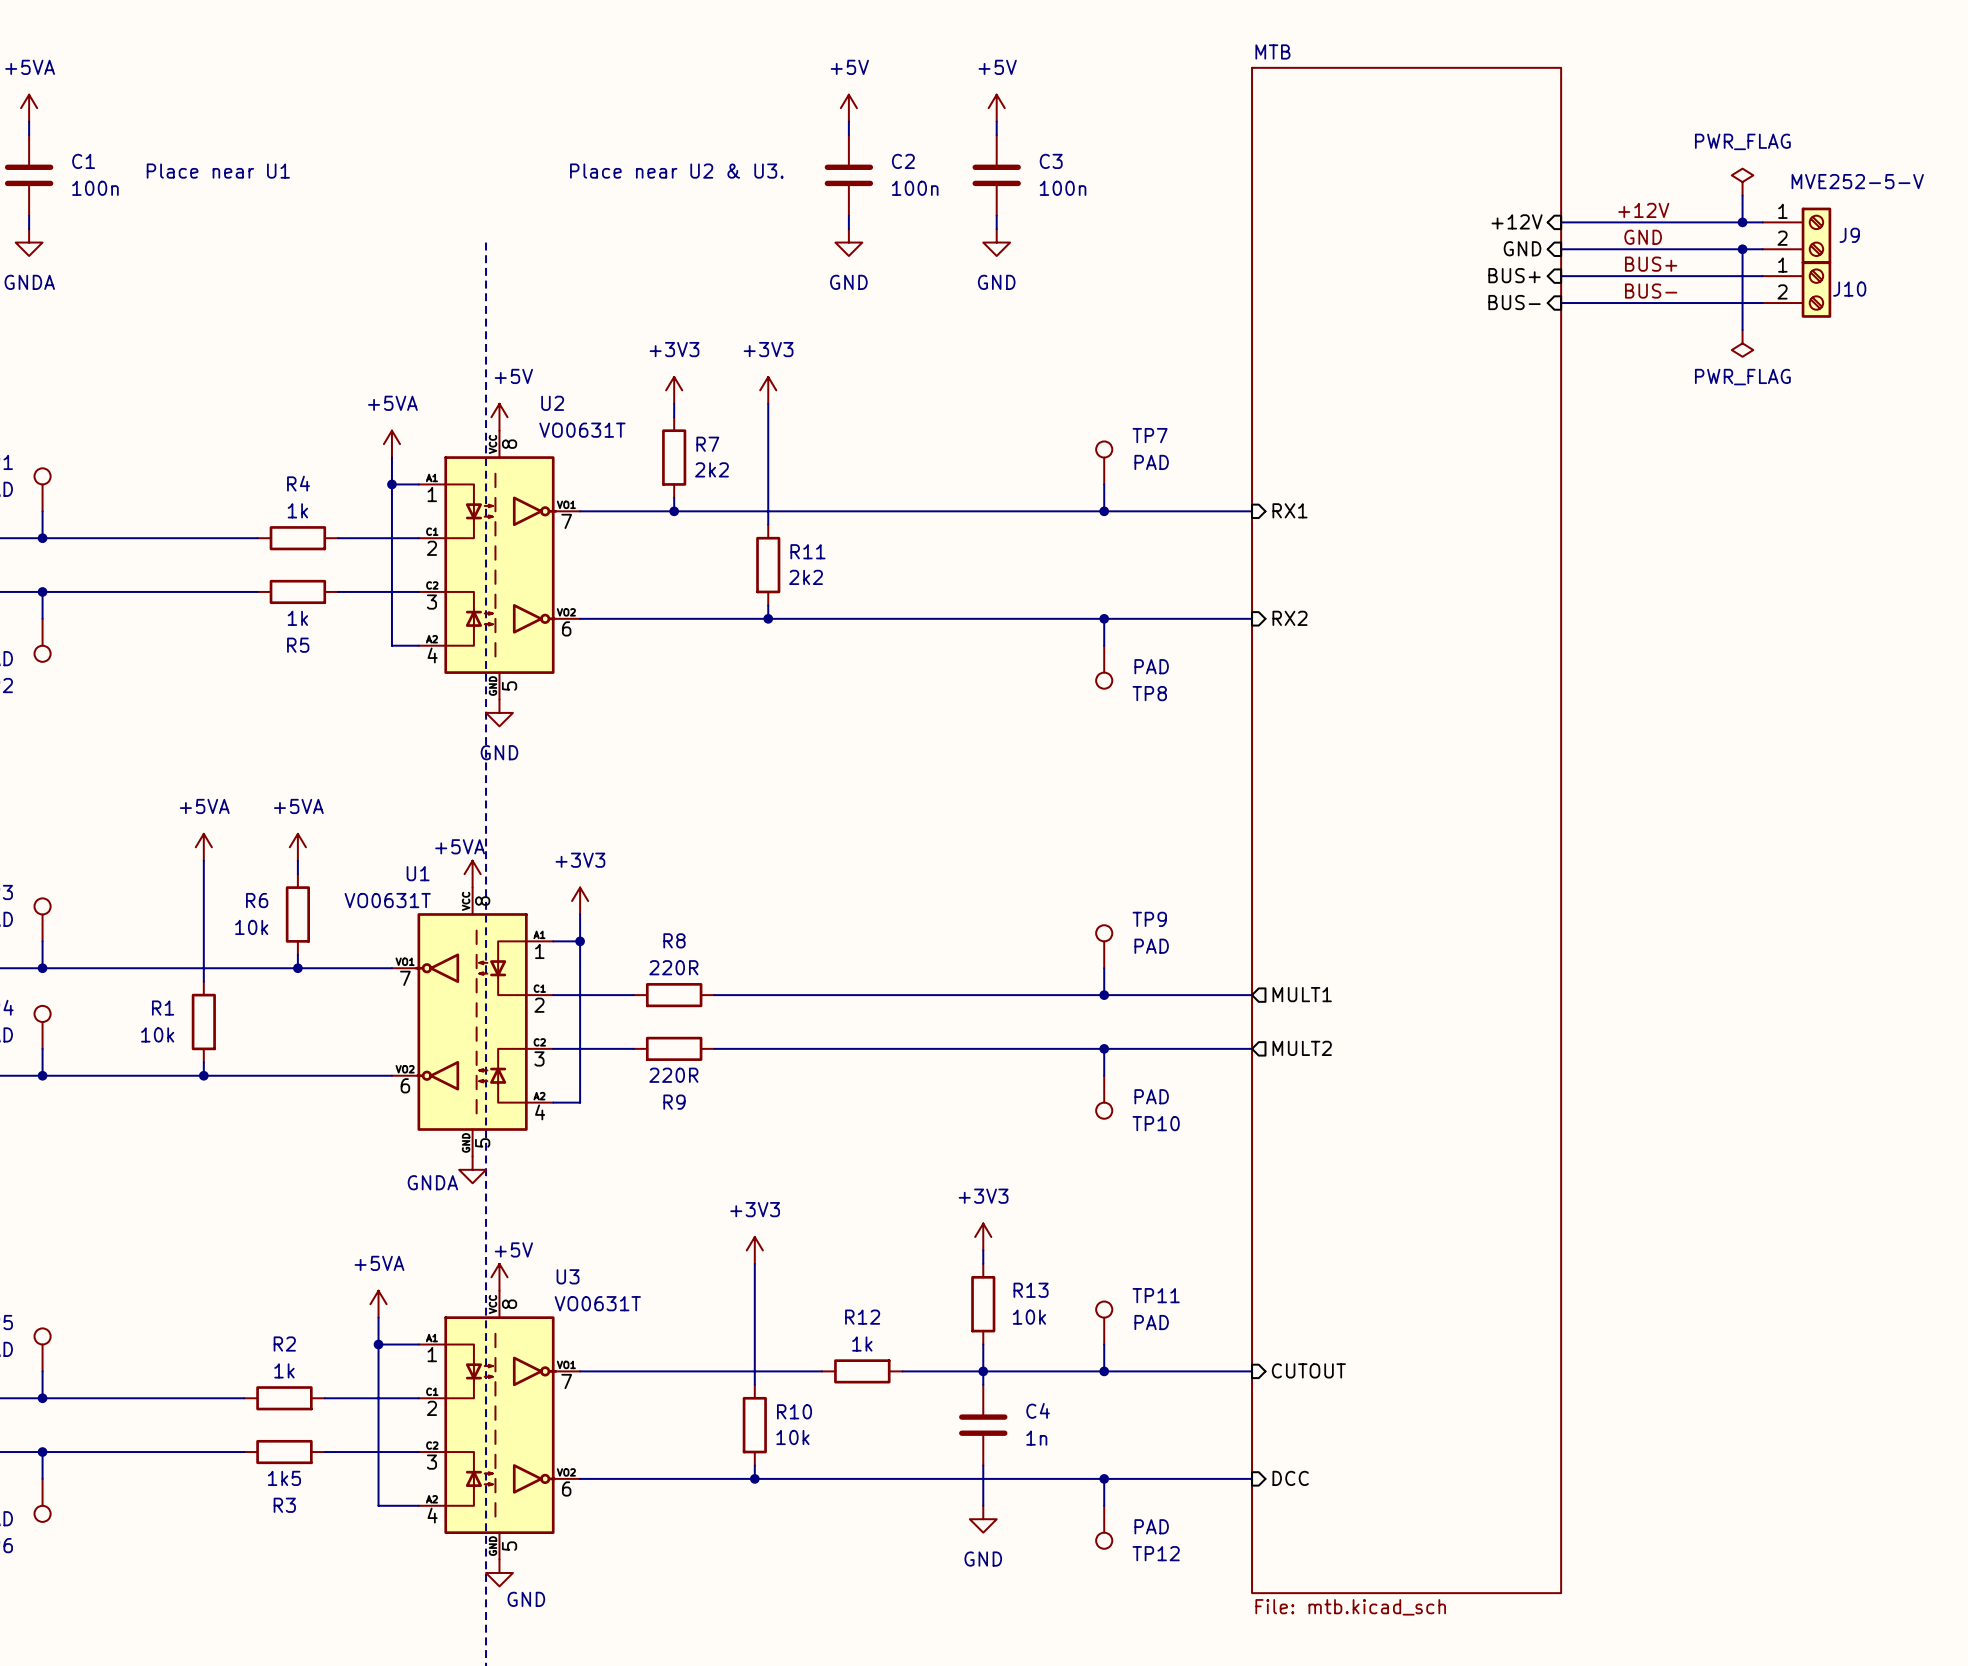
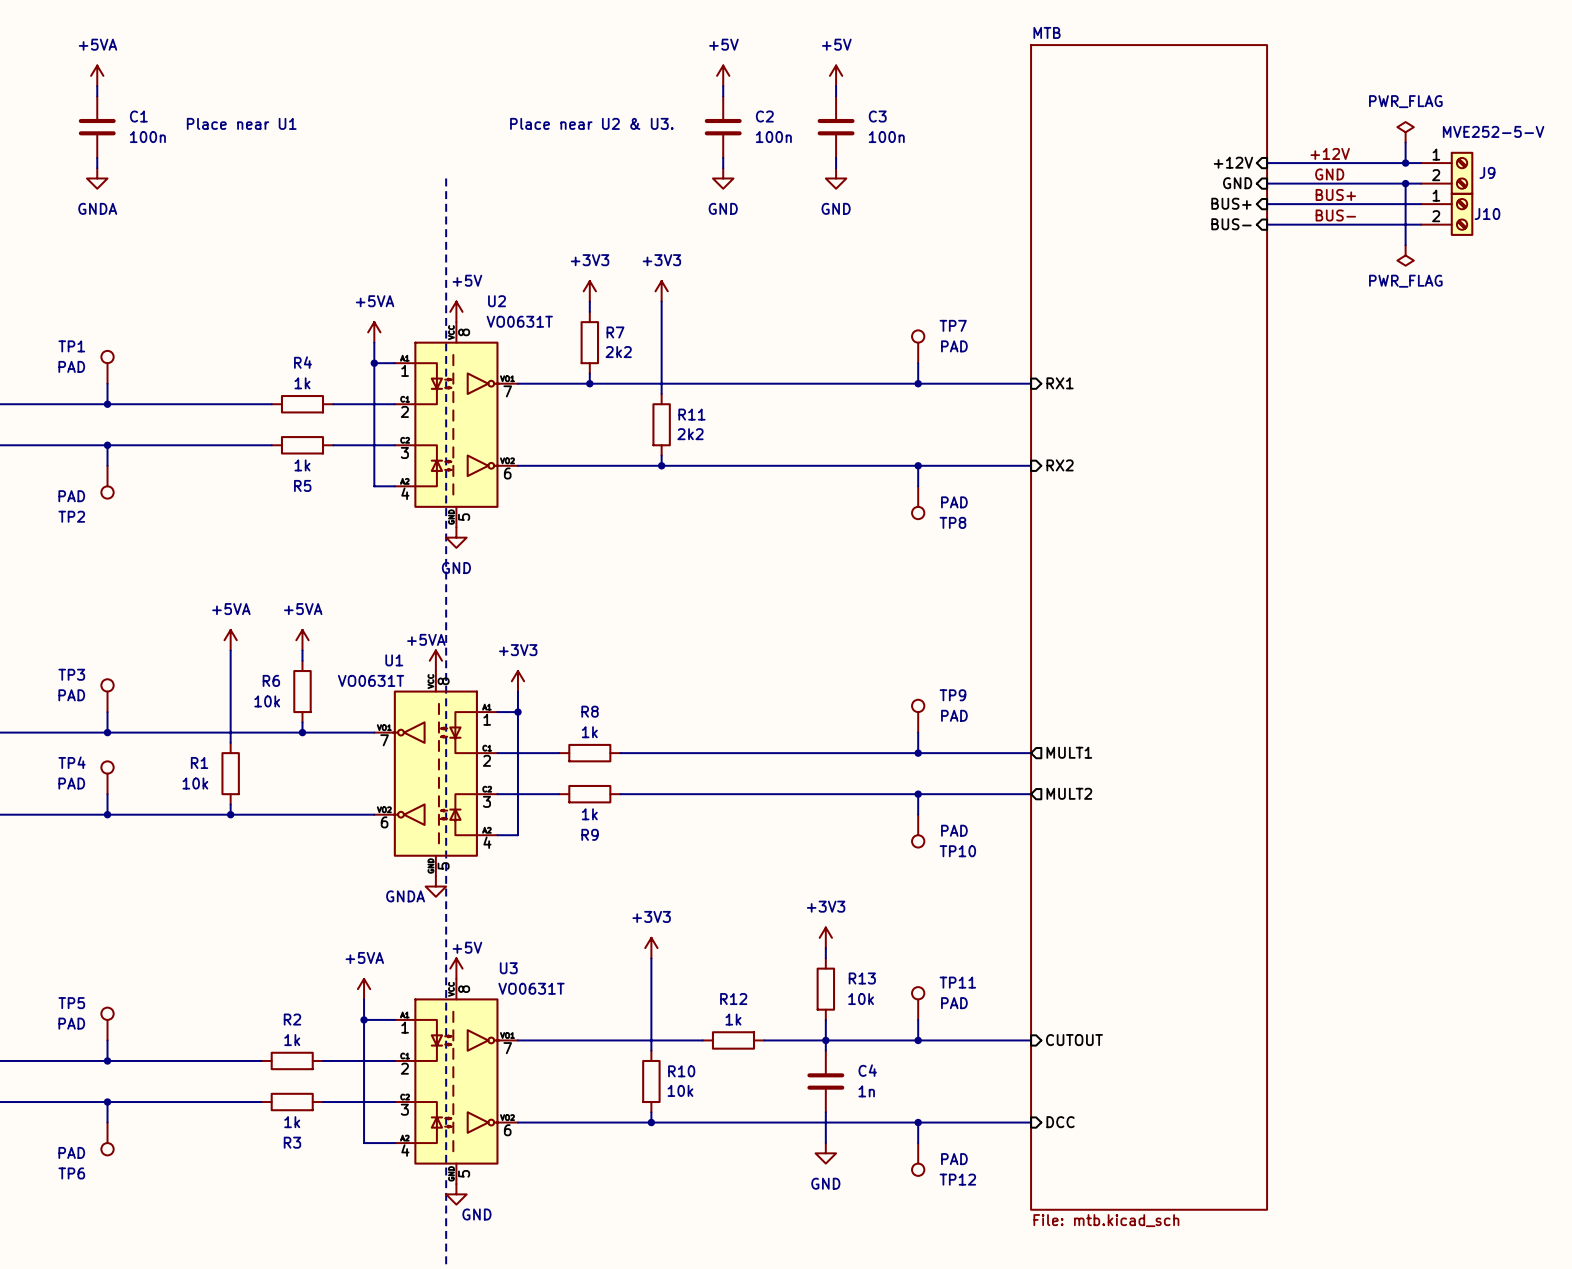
R8 value: 220R (673, 967) -> 1k (589, 732)
R9 value: 220R (673, 1075) -> 1k (589, 814)
R3 value: 1k5 (284, 1478) -> 1k (292, 1122)

